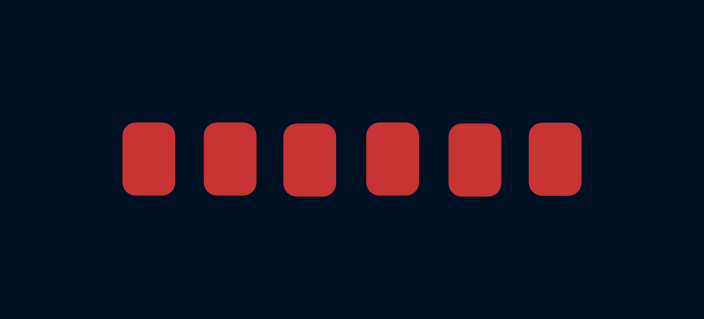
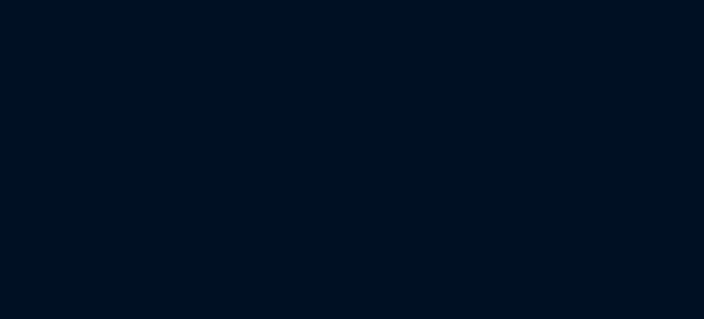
part: (148, 159) -> none
part: (230, 159) -> none
part: (392, 159) -> none
part: (555, 159) -> none
part: (309, 160) -> none
part: (474, 160) -> none

